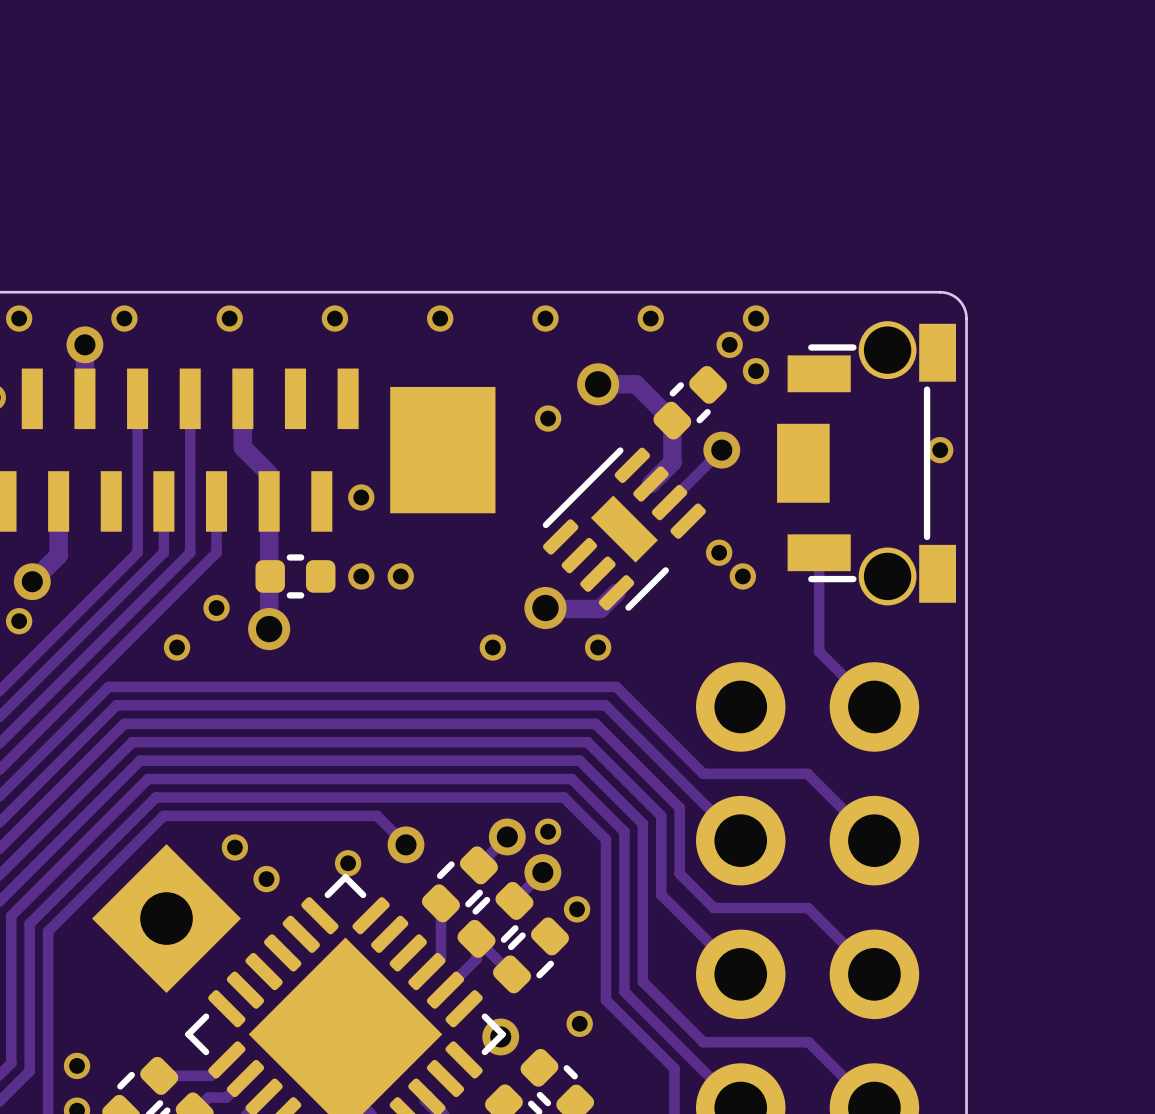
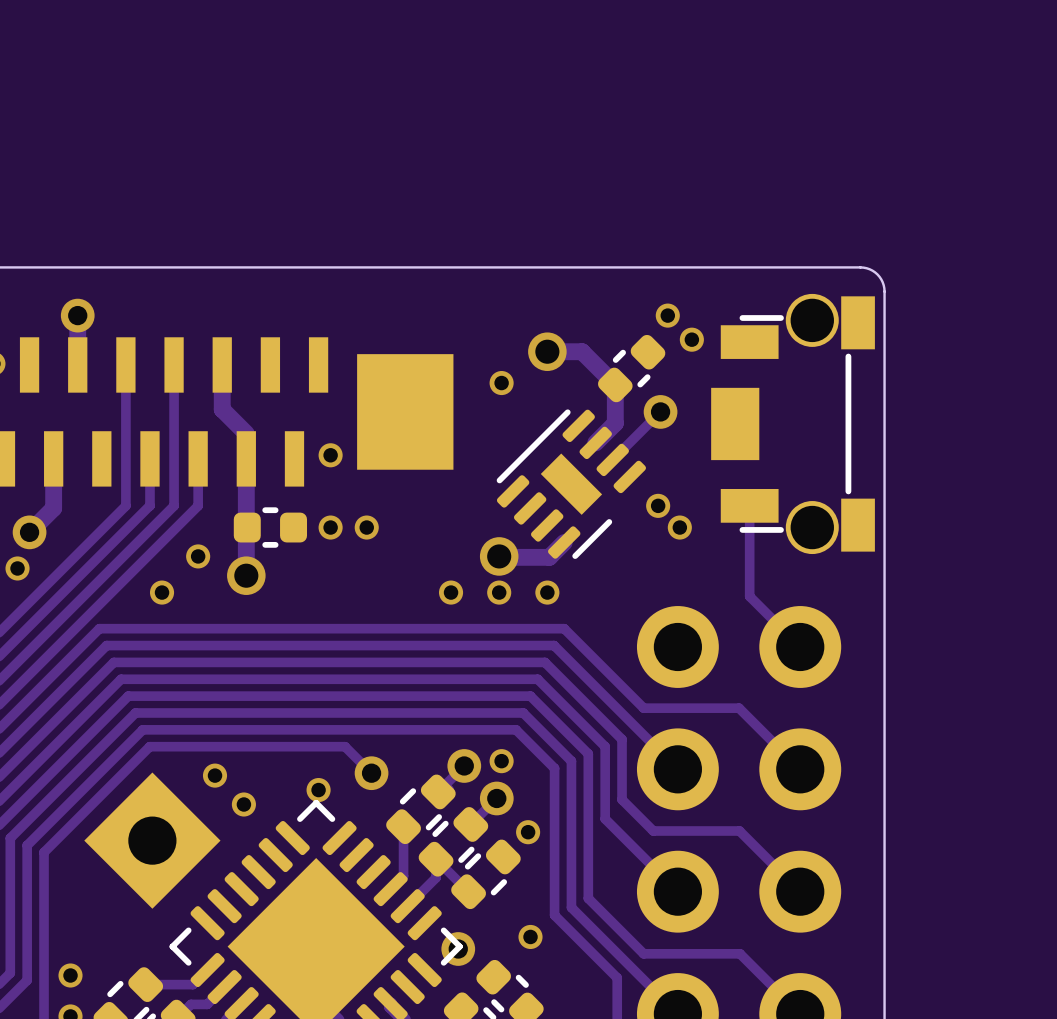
via: (19, 318) -> none
via: (124, 318) -> none
via: (229, 318) -> none
via: (334, 318) -> none
via: (440, 318) -> none
via: (545, 318) -> none
via: (650, 318) -> none
via: (756, 318) -> none
via: (940, 450) -> none
via: none -> (499, 592)

